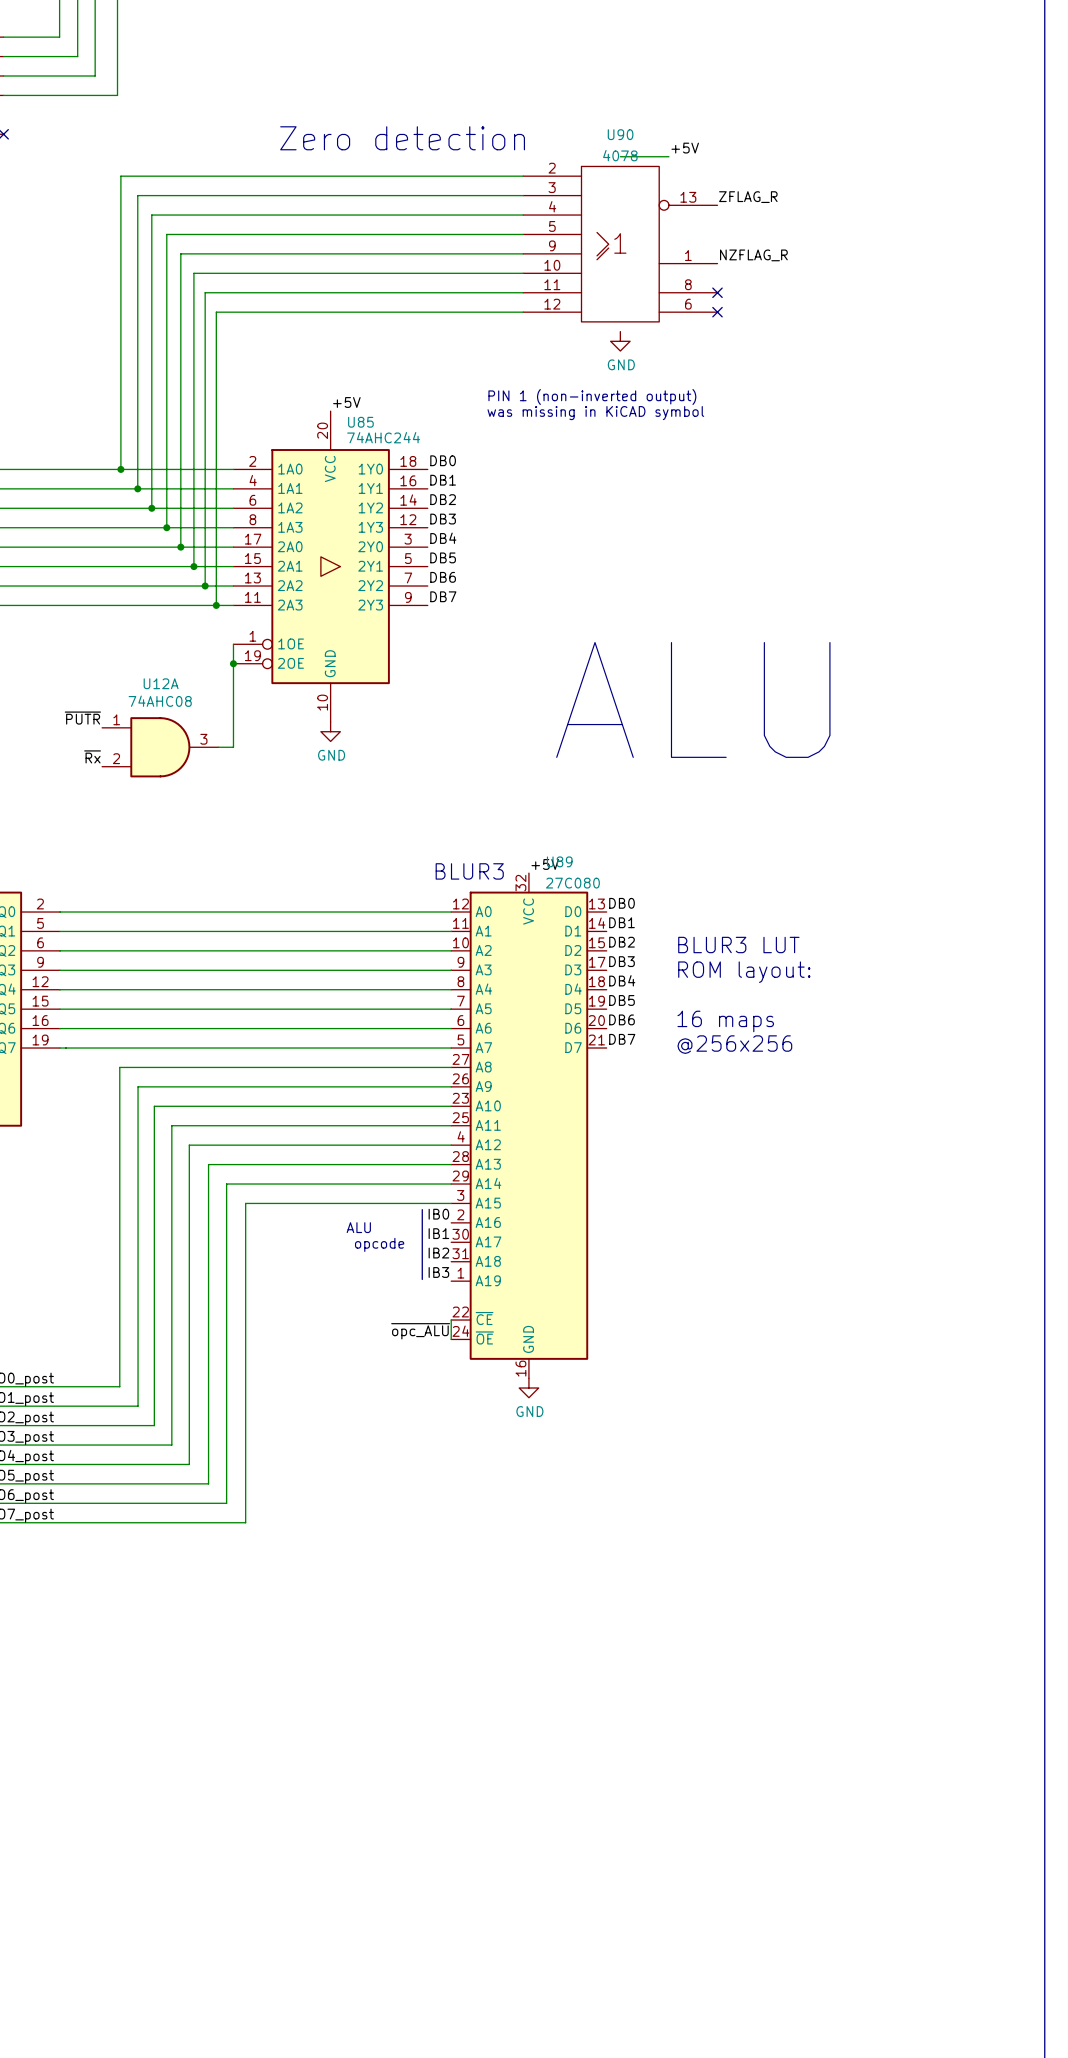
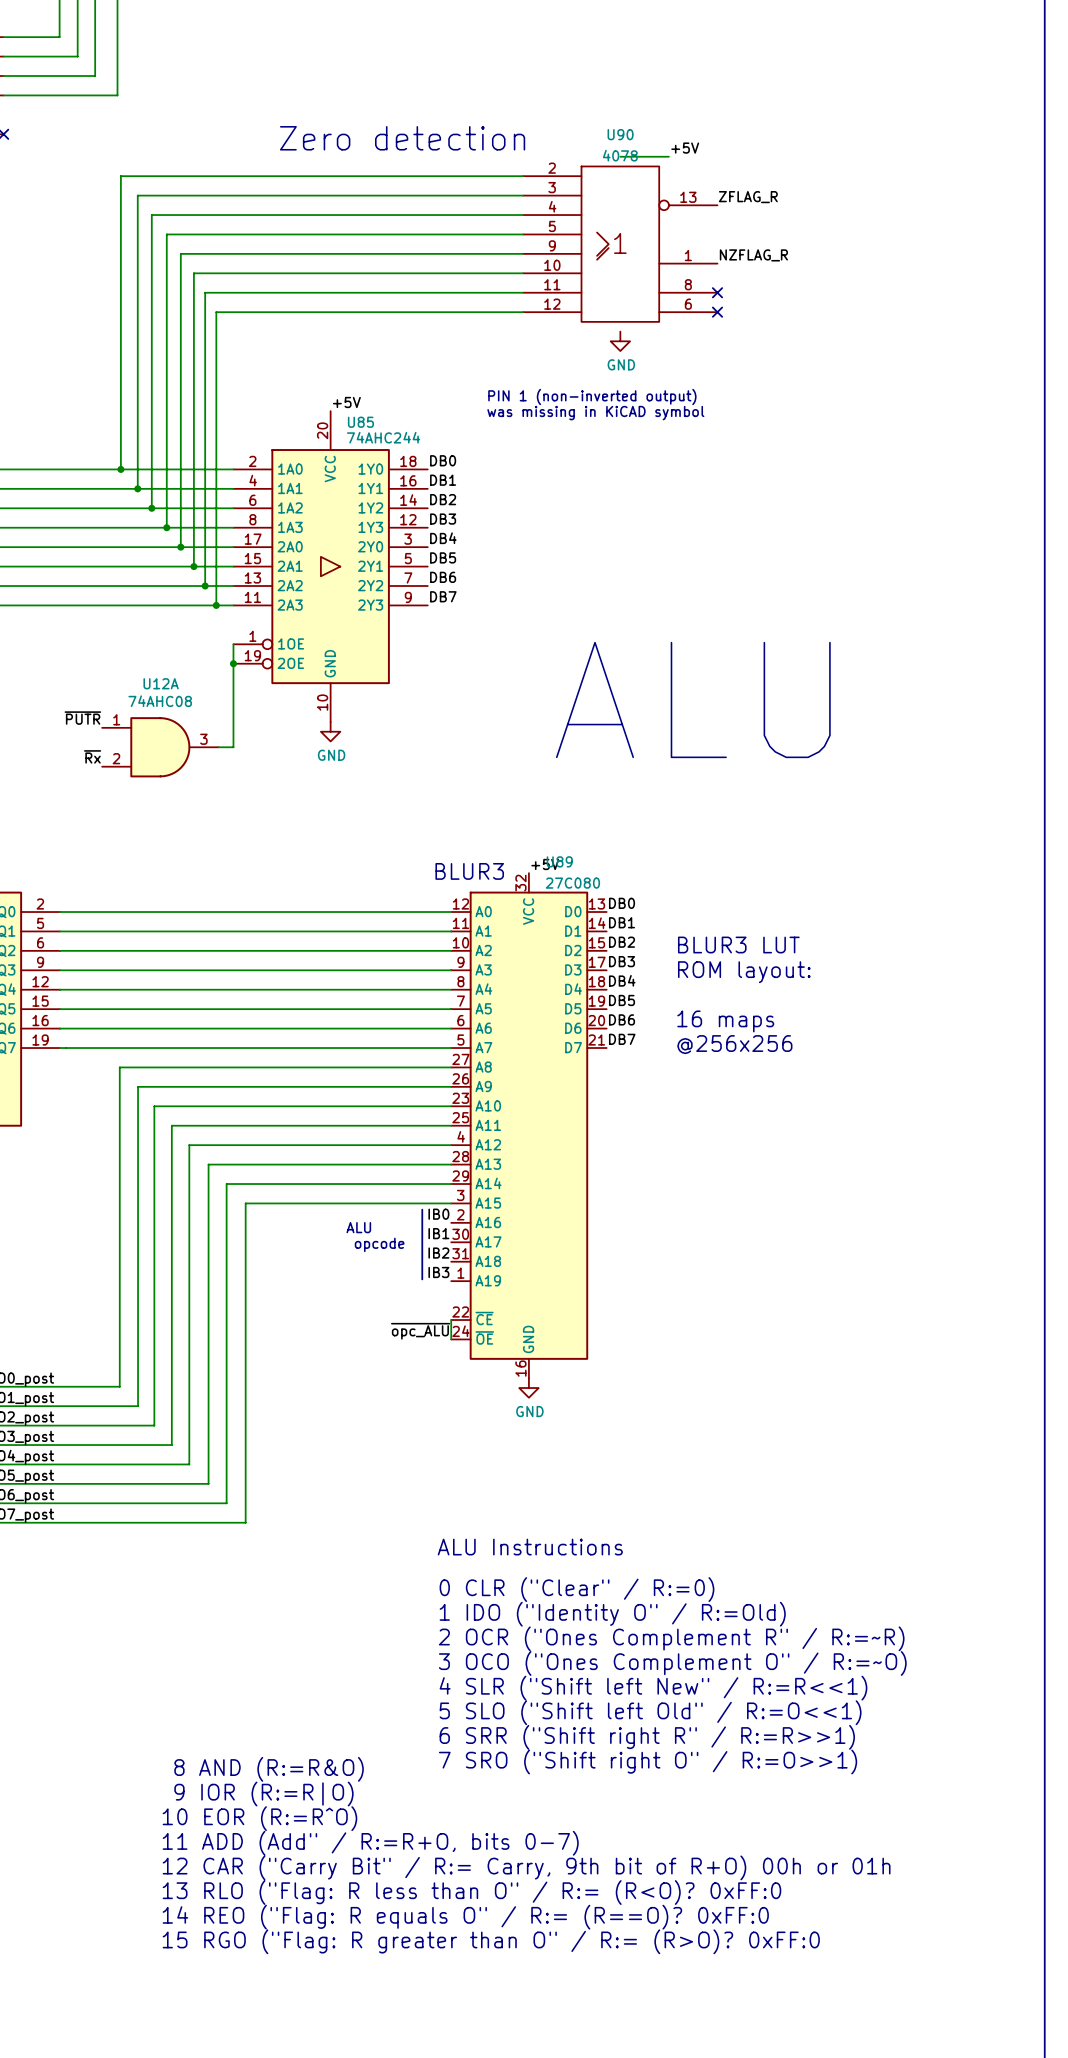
text: none -> ALU Instructions (530, 1547)
text: none -> 0 CLR ("Clear" / R:=0) (576, 1589)
text: none -> 1 IDO ("Identity O" / R:=Old) (612, 1614)
text: none -> 2 OCR ("Ones Complement R" / R:=~R) (671, 1638)
text: none -> 3 OCO ("Ones Complement O" / R:=~O) (672, 1663)
text: none -> 4 SLR ("Shift left New" / R:=R<<1) (653, 1688)
text: none -> 5 SLO ("Shift left Old" / R:=O<<1) (650, 1712)
text: none -> 6 SRR ("Shift right R" / R:=R>>1) (647, 1737)
text: none -> 7 SRO ("Shift right O" / R:=O>>1) (648, 1761)
text: none -> 8 AND (R:=R&O) (269, 1769)
text: none -> 9 IOR (R:=R|O) (263, 1794)
text: none -> 10 EOR (R:=R^O) (259, 1818)
text: none -> 11 ADD (Add" / R:=R+O, bits 0-7) (370, 1843)
text: none -> 12 CAR ("Carry Bit" / R:= Carry, 9th bit of R+O) 00h or 01h (526, 1867)
text: none -> 13 RLO ("Flag: R less than O" / R:= (R<O)? 0xFF:0 (471, 1892)
text: none -> 14 REO ("Flag: R equals O" / R:= (R==O)? 0xFF:0 (465, 1917)
text: none -> 15 RGO ("Flag: R greater than O" / R:= (R>O)? 0xFF:0 (491, 1941)

